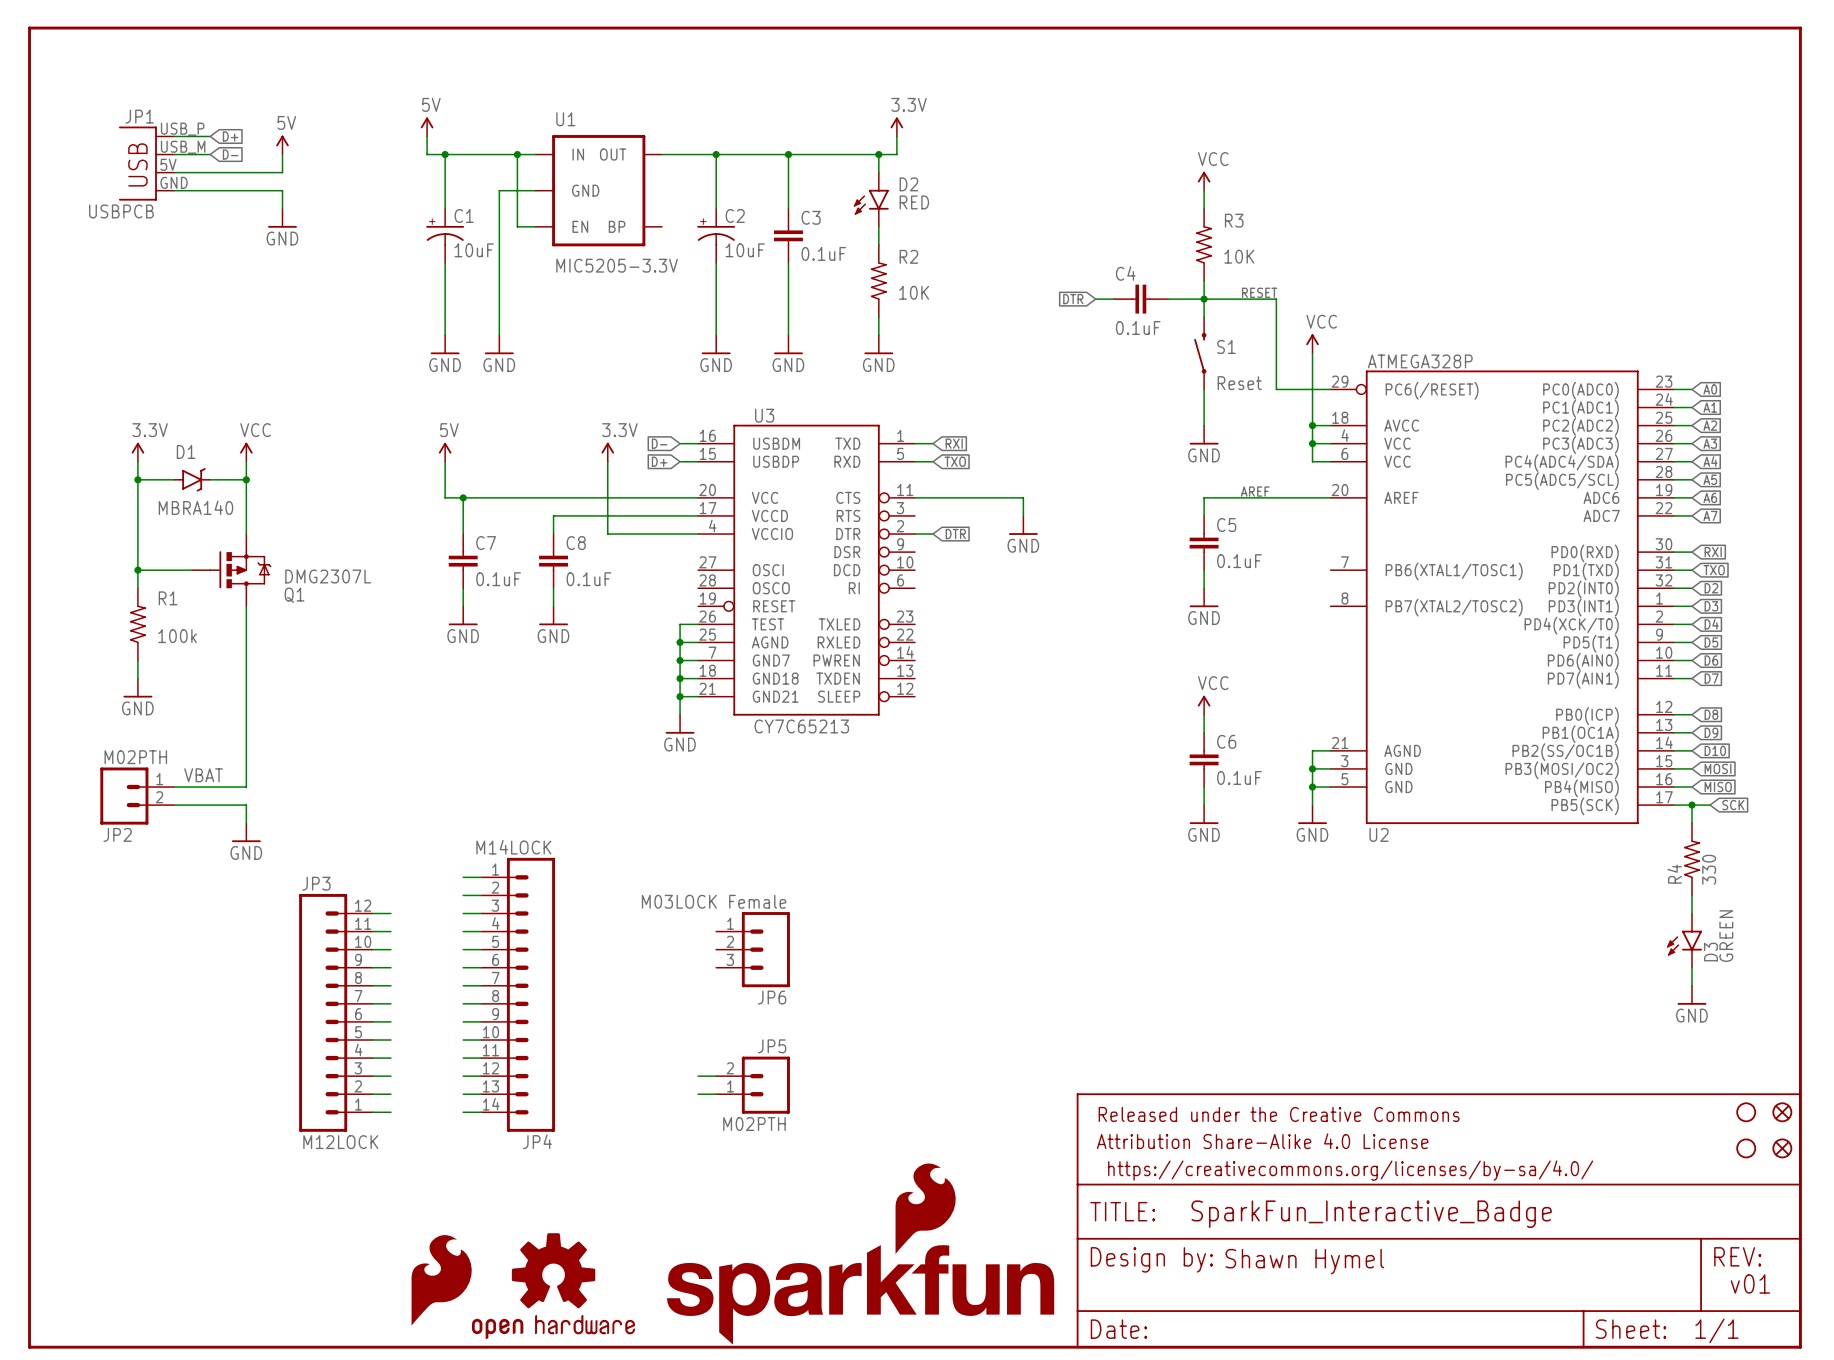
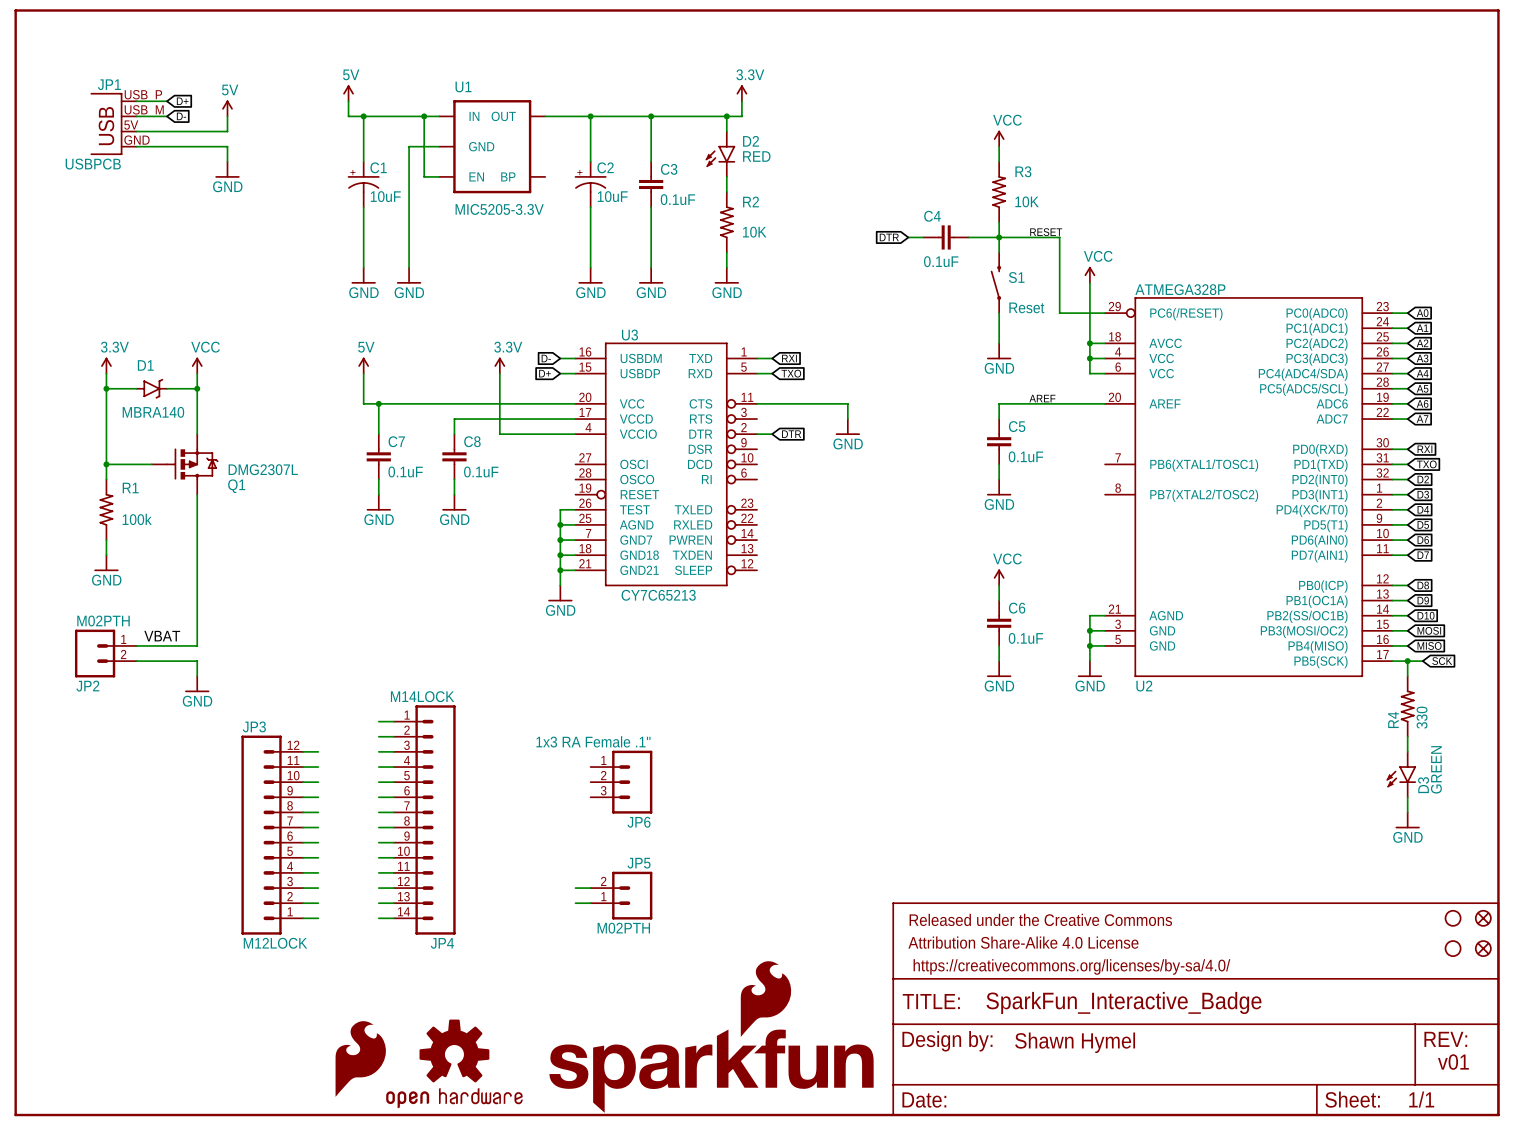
JP6 value: M03LOCK Female (714, 901) -> 1x3 RA Female .1" (593, 741)

